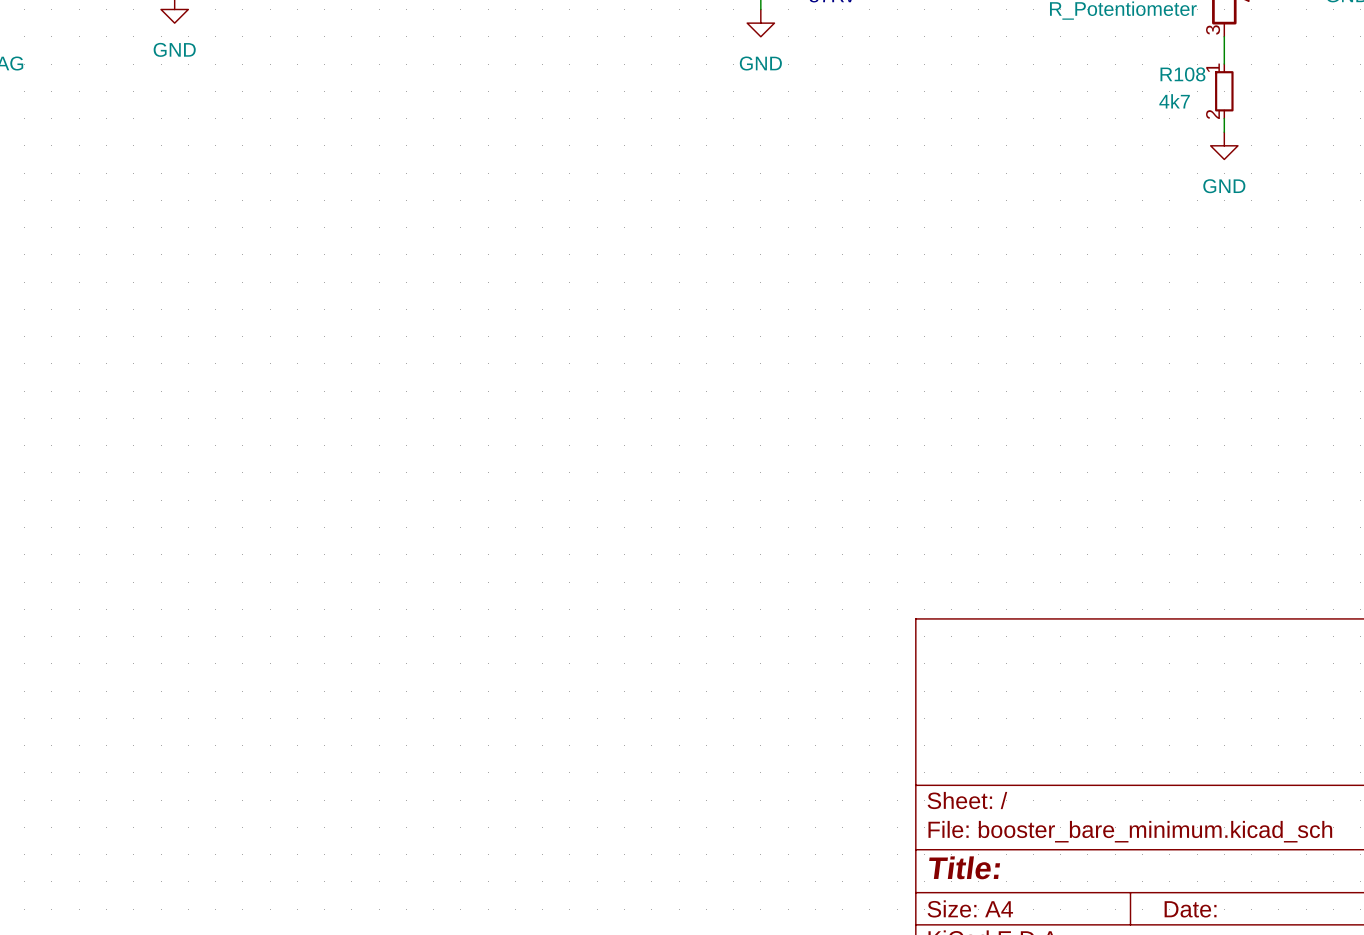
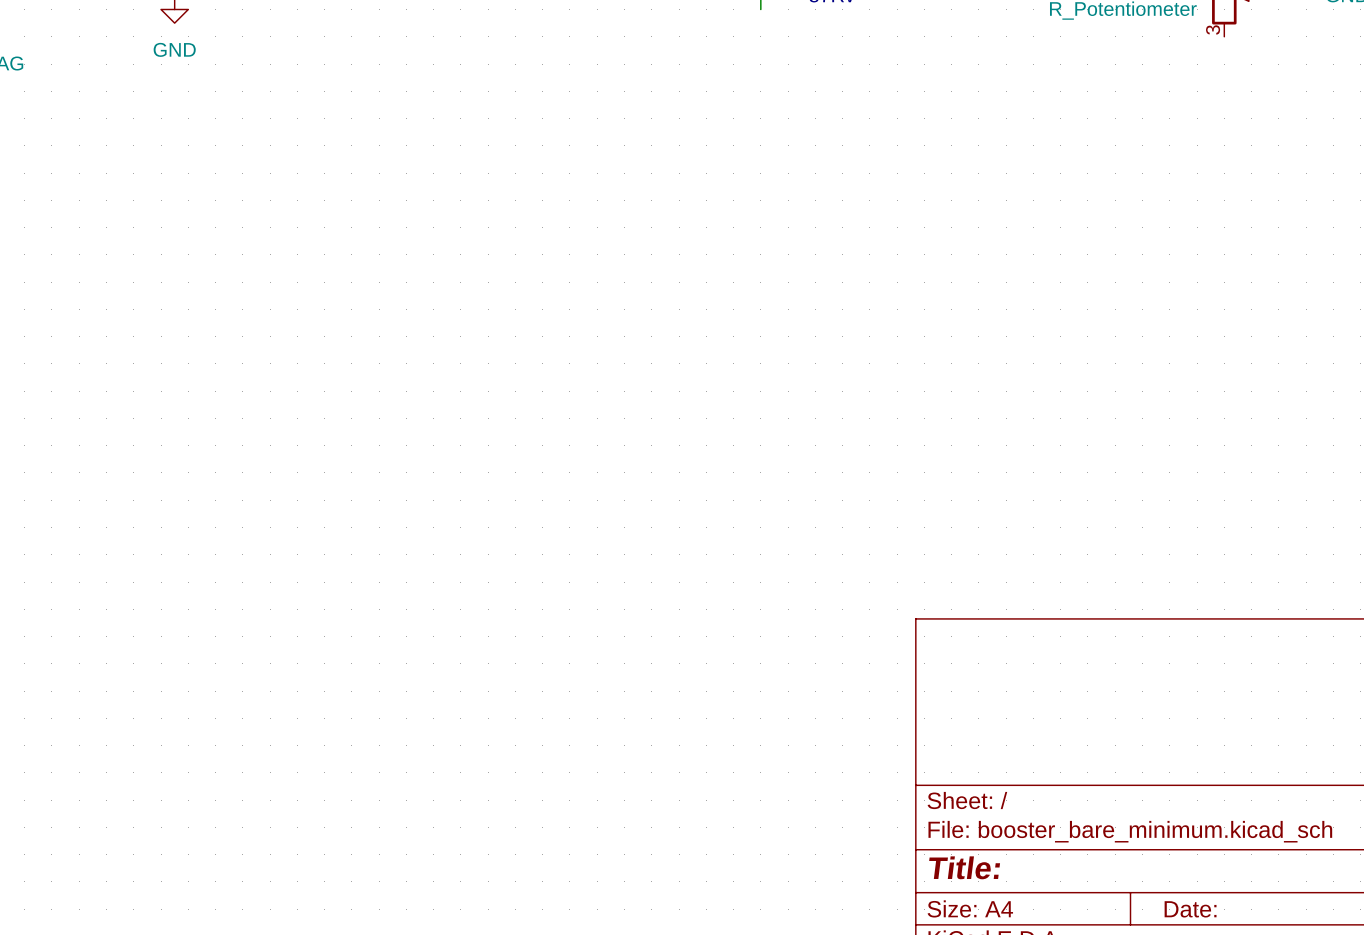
power symbol: GND (760, 23) -> none
wire: (1224, 36) (1224, 64) -> none
R108: 4k7 (1224, 91) -> none
wire: (1224, 118) (1224, 132) -> none
power symbol: GND (1224, 145) -> none

